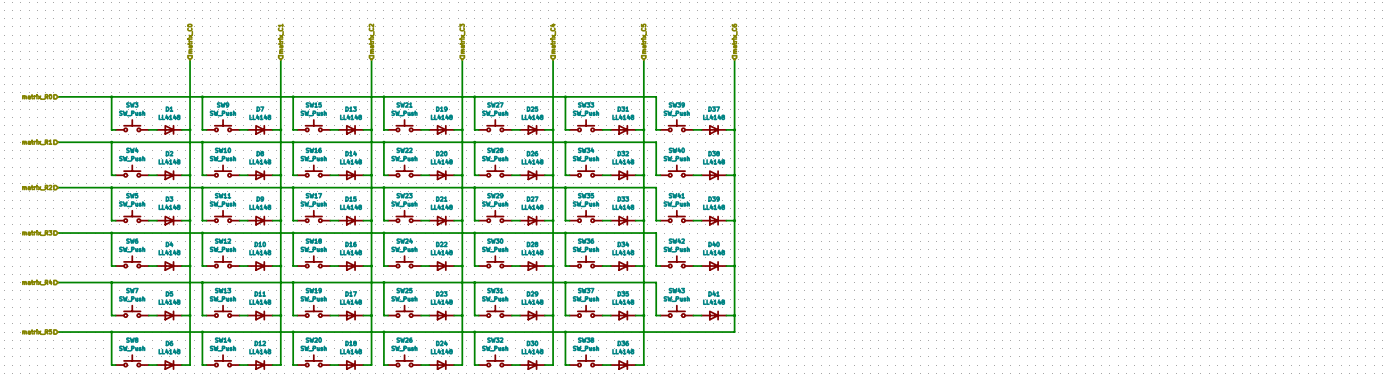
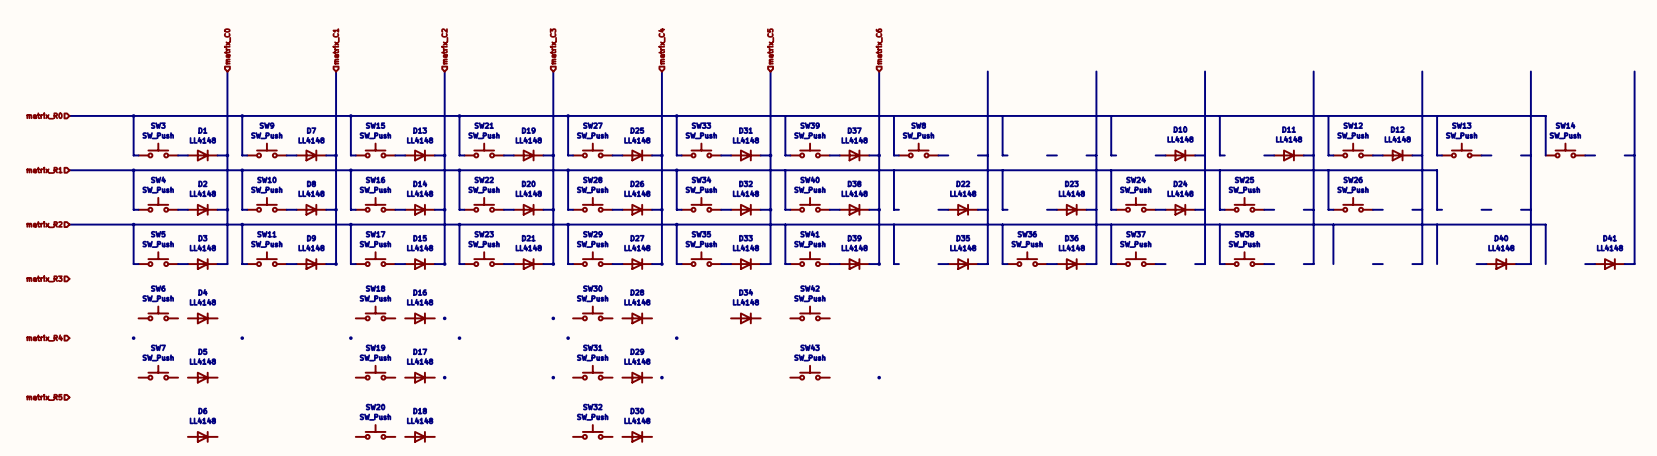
wire: none -> (987, 71) (987, 264) (977, 264)
wire: none -> (1096, 71) (1096, 264) (1086, 264)
wire: none -> (1205, 71) (1205, 264) (1195, 264)
wire: none -> (1313, 71) (1313, 264) (1303, 264)
wire: none -> (1422, 71) (1422, 264) (1412, 264)
wire: none -> (1530, 71) (1530, 264) (1516, 264)
wire: none -> (1634, 71) (1634, 264) (1624, 264)
wire: none -> (785, 115) (1545, 115) (1545, 155)
wire: none -> (893, 115) (893, 155) (898, 155)
wire: none -> (1002, 115) (1002, 155) (1007, 155)
wire: none -> (1111, 115) (1111, 155) (1116, 155)
wire: none -> (1219, 115) (1219, 155) (1224, 155)
wire: none -> (1328, 115) (1328, 155) (1333, 155)
wire: none -> (1437, 115) (1437, 155) (1442, 155)
wire: none -> (938, 155) (948, 155)
wire: none -> (977, 155) (987, 155)
wire: none -> (1047, 155) (1056, 155)
wire: none -> (1086, 155) (1096, 155)
wire: none -> (1155, 155) (1165, 155)
wire: none -> (1195, 155) (1205, 155)
wire: none -> (1264, 155) (1274, 155)
wire: none -> (1303, 155) (1313, 155)
wire: none -> (1372, 155) (1382, 155)
wire: none -> (1412, 155) (1422, 155)
wire: none -> (1481, 155) (1491, 155)
wire: none -> (1521, 155) (1530, 155)
wire: none -> (1585, 155) (1595, 155)
wire: none -> (1624, 155) (1634, 155)
wire: none -> (785, 170) (1437, 170) (1437, 209) (1442, 209)
wire: none -> (893, 170) (893, 209) (898, 209)
wire: none -> (1002, 170) (1002, 209) (1007, 209)
wire: none -> (1111, 170) (1111, 209) (1116, 209)
wire: none -> (1219, 170) (1219, 209) (1224, 209)
wire: none -> (1328, 170) (1328, 209) (1333, 209)
wire: none -> (938, 209) (948, 209)
wire: none -> (977, 209) (987, 209)
wire: none -> (1047, 209) (1056, 209)
wire: none -> (1086, 209) (1096, 209)
wire: none -> (1155, 209) (1165, 209)
wire: none -> (1195, 209) (1205, 209)
wire: none -> (1264, 209) (1274, 209)
wire: none -> (1303, 209) (1313, 209)
wire: none -> (1372, 209) (1382, 209)
wire: none -> (1412, 209) (1422, 209)
wire: none -> (1481, 209) (1491, 209)
wire: none -> (1521, 209) (1530, 209)
wire: none -> (785, 224) (1545, 224) (1545, 264)
wire: none -> (893, 224) (893, 264) (898, 264)
wire: none -> (1002, 224) (1002, 264) (1007, 264)
wire: none -> (1111, 224) (1111, 264) (1116, 264)
wire: none -> (1219, 224) (1219, 264) (1224, 264)
wire: none -> (1333, 224) (1333, 264)
wire: none -> (1437, 224) (1437, 264)
wire: (190, 220) (190, 365) (181, 365) -> none
wire: (280, 220) (280, 365) (272, 365) -> none
wire: (371, 220) (371, 365) (363, 365) -> none
wire: (462, 220) (462, 365) (454, 365) -> none
wire: (553, 220) (553, 365) (544, 365) -> none
wire: (643, 220) (643, 365) (635, 365) -> none
wire: (734, 220) (734, 332) (58, 332) -> none
wire: none -> (1047, 264) (1056, 264)
wire: none -> (1155, 264) (1165, 264)
wire: none -> (1264, 264) (1274, 264)
wire: none -> (1372, 264) (1382, 264)
wire: none -> (1476, 264) (1486, 264)
wire: none -> (1585, 264) (1595, 264)
wire: (58, 233) (656, 233) (656, 266) (660, 266) -> none
wire: (111, 233) (111, 266) (115, 266) -> none
wire: (202, 233) (202, 266) (206, 266) -> none
wire: (293, 233) (293, 266) (297, 266) -> none
wire: (383, 233) (383, 266) (388, 266) -> none
wire: (474, 233) (474, 266) (478, 266) -> none
wire: (565, 233) (565, 266) (569, 266) -> none
part position: (223, 261) -> (1353, 150)
part position: (404, 261) -> (1135, 204)
part position: (586, 261) -> (1027, 259)
wire: (148, 266) (157, 266) -> none
wire: (181, 266) (190, 266) -> none
wire: (239, 266) (247, 266) -> none
part position: (260, 266) -> (1180, 155)
wire: (272, 266) (280, 266) -> none
wire: (330, 266) (338, 266) -> none
wire: (363, 266) (371, 266) -> none
wire: (421, 266) (429, 266) -> none
part position: (441, 266) -> (963, 209)
wire: (454, 266) (462, 266) -> none
wire: (511, 266) (520, 266) -> none
wire: (544, 266) (553, 266) -> none
wire: (602, 266) (610, 266) -> none
wire: (635, 266) (643, 266) -> none
wire: (693, 266) (701, 266) -> none
part position: (713, 266) -> (1501, 264)
wire: (726, 266) (734, 266) -> (938, 264) (948, 264)
wire: (58, 282) (656, 282) (656, 315) (660, 315) -> none
wire: (111, 282) (111, 315) (115, 315) -> none
wire: (202, 282) (202, 315) (206, 315) -> none
wire: (293, 282) (293, 315) (297, 315) -> none
wire: (383, 282) (383, 315) (388, 315) -> none
wire: (474, 282) (474, 315) (478, 315) -> none
wire: (565, 282) (565, 315) (569, 315) -> none
part position: (223, 311) -> (1461, 150)
part position: (404, 311) -> (1244, 204)
part position: (586, 311) -> (1135, 259)
wire: (148, 315) (157, 315) -> none
wire: (181, 315) (190, 315) -> none
wire: (239, 315) (247, 315) -> none
part position: (260, 315) -> (1288, 155)
wire: (272, 315) (280, 315) -> none
wire: (330, 315) (338, 315) -> none
wire: (363, 315) (371, 315) -> none
wire: (421, 315) (429, 315) -> none
part position: (441, 315) -> (1071, 209)
wire: (454, 315) (462, 315) -> none
wire: (511, 315) (520, 315) -> none
wire: (544, 315) (553, 315) -> none
wire: (602, 315) (610, 315) -> none
part position: (623, 315) -> (963, 264)
wire: (635, 315) (643, 315) -> none
wire: (693, 315) (701, 315) -> none
part position: (713, 315) -> (1609, 264)
wire: (726, 315) (734, 315) -> none
wire: (111, 332) (111, 365) (115, 365) -> none
wire: (202, 332) (202, 365) (206, 365) -> none
wire: (293, 332) (293, 365) (297, 365) -> none
wire: (383, 332) (383, 365) (388, 365) -> none
wire: (474, 332) (474, 365) (478, 365) -> none
wire: (565, 332) (565, 365) (569, 365) -> none
part position: (132, 360) -> (918, 150)
part position: (223, 360) -> (1565, 150)
part position: (404, 360) -> (1353, 204)
part position: (586, 360) -> (1244, 259)
wire: (148, 365) (157, 365) -> none
wire: (239, 365) (247, 365) -> none
part position: (260, 365) -> (1397, 155)
wire: (330, 365) (338, 365) -> none
wire: (421, 365) (429, 365) -> none
part position: (441, 365) -> (1180, 209)
wire: (511, 365) (520, 365) -> none
wire: (602, 365) (610, 365) -> none
part position: (623, 365) -> (1071, 264)

